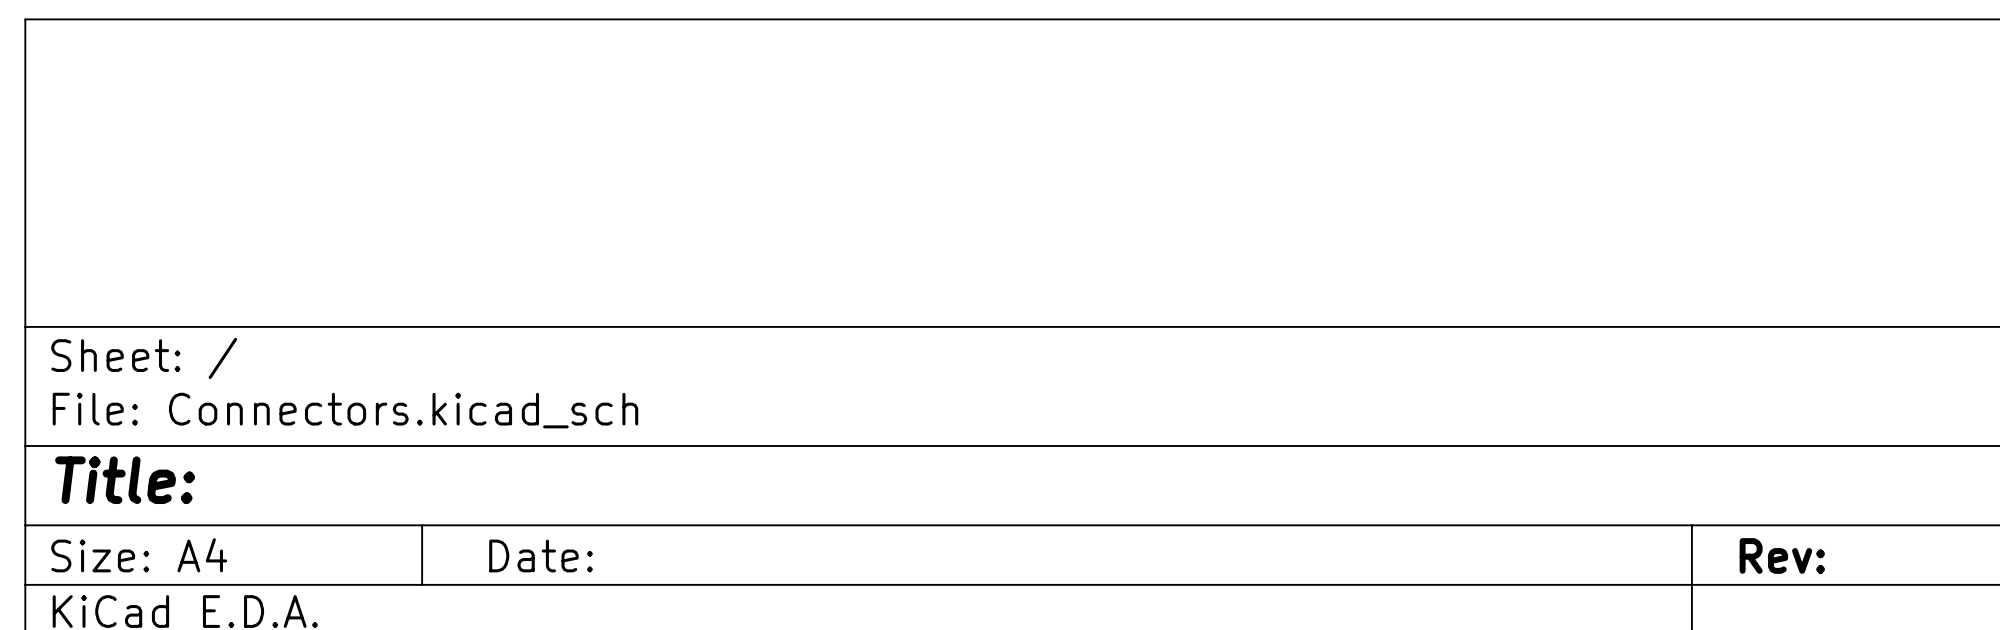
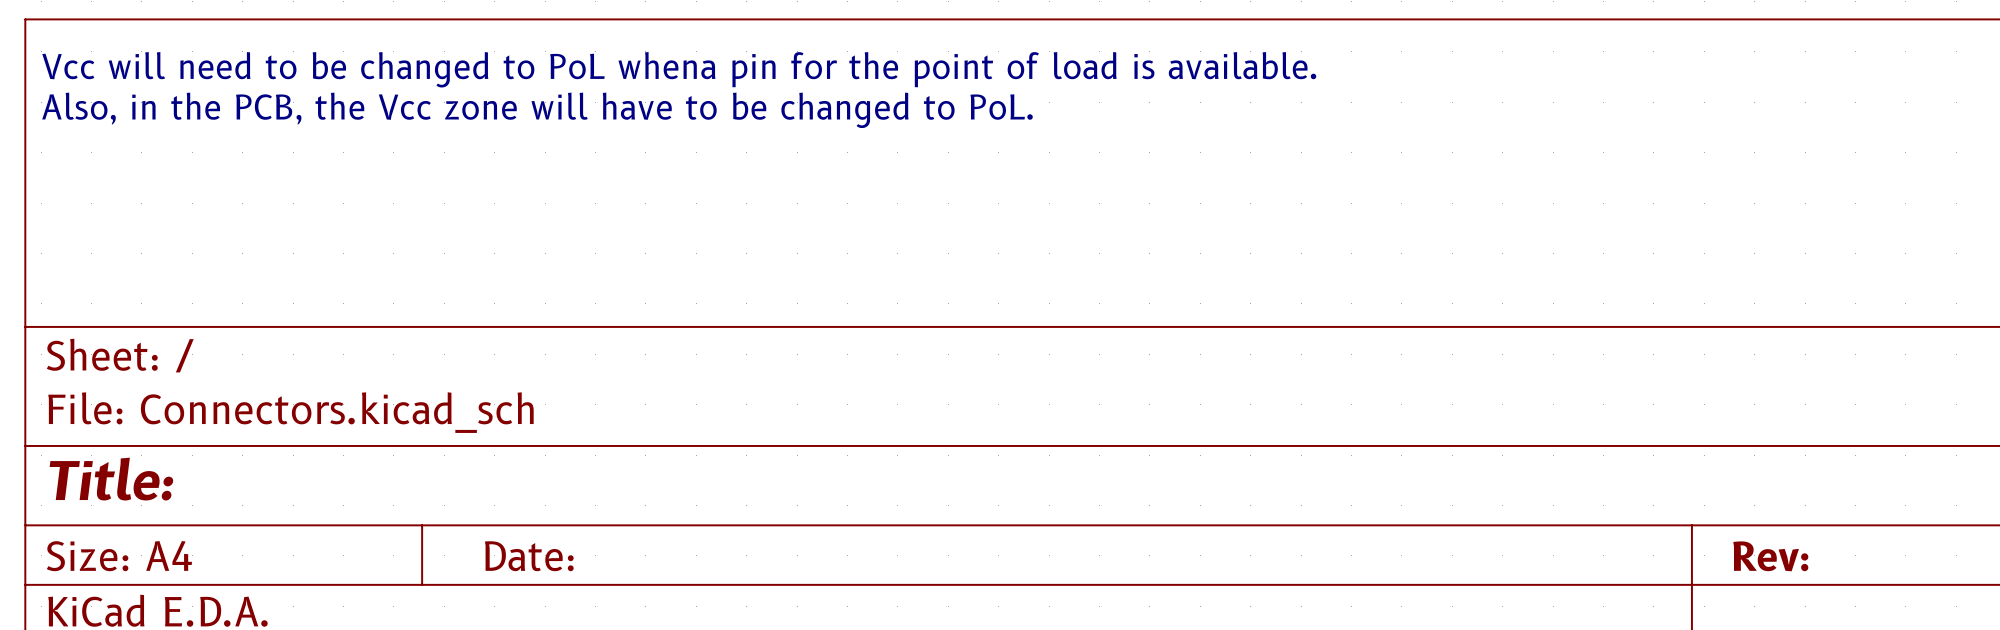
text: none -> Vcc will need to be changed to PoL whena pin for the point of load is available. (679, 69)
text: none -> Also, in the PCB, the Vcc zone will have to be changed to PoL. (537, 110)

